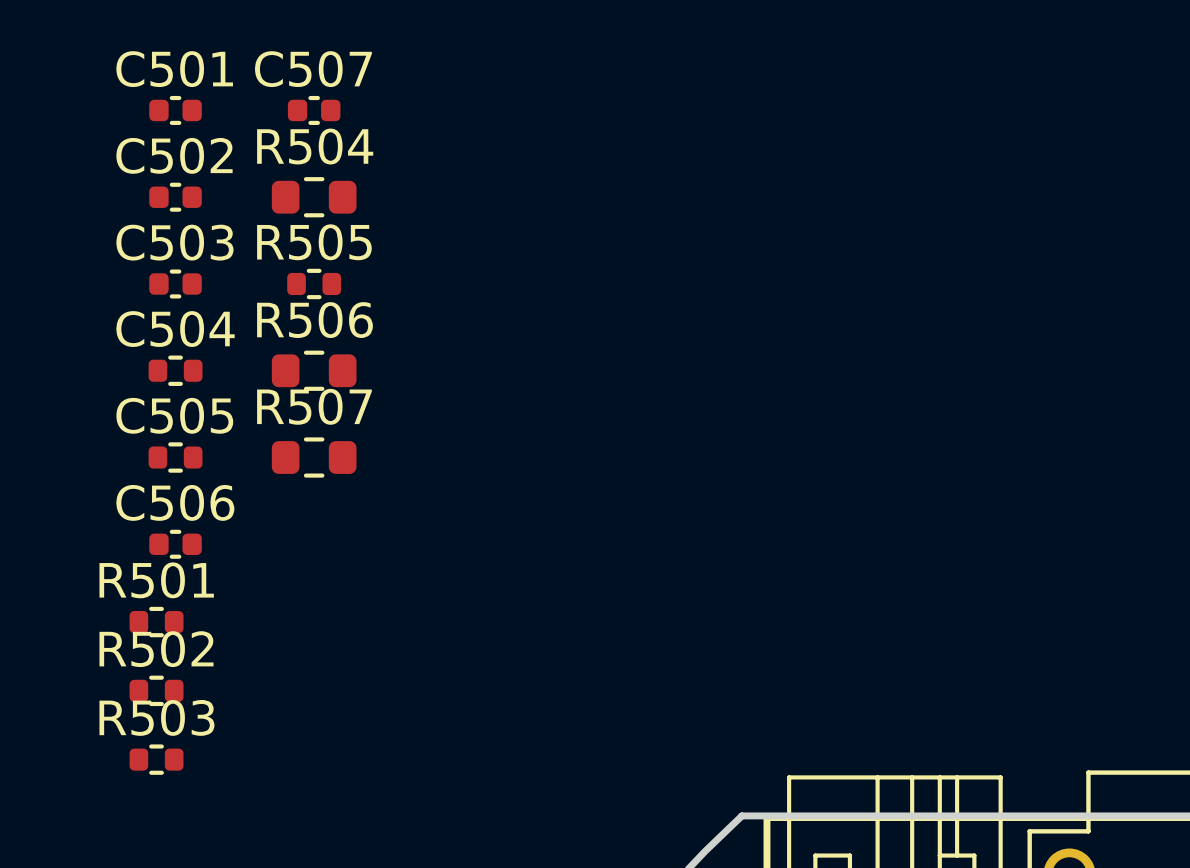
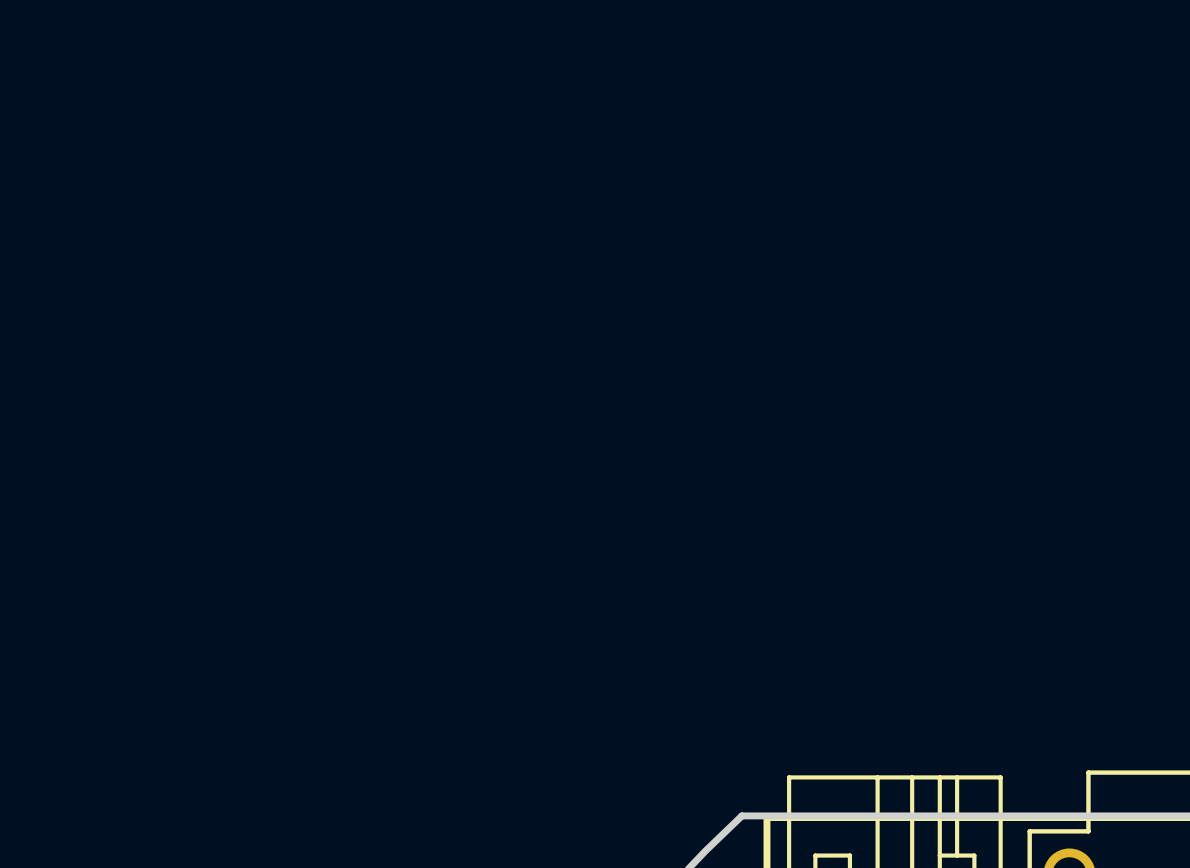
C501: (175, 110) -> none
C507: (314, 110) -> none
C502: (175, 197) -> none
R504: (314, 197) -> none
C503: (175, 283) -> none
R505: (314, 283) -> none
C504: (175, 370) -> none
R506: (314, 370) -> none
C505: (175, 457) -> none
R507: (314, 457) -> none
C506: (175, 544) -> none
R501: (156, 622) -> none
R502: (156, 690) -> none
R503: (156, 759) -> none

